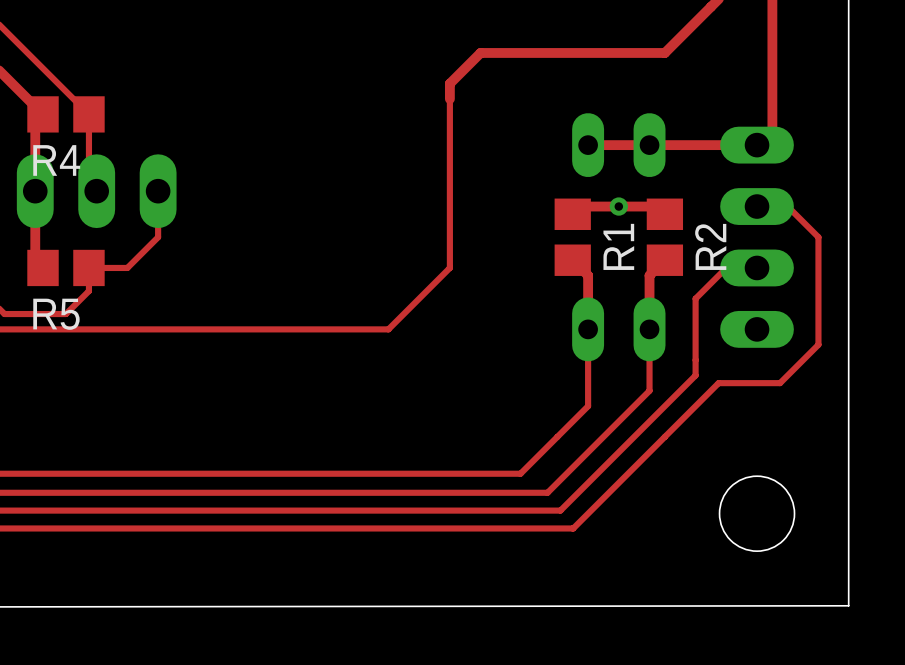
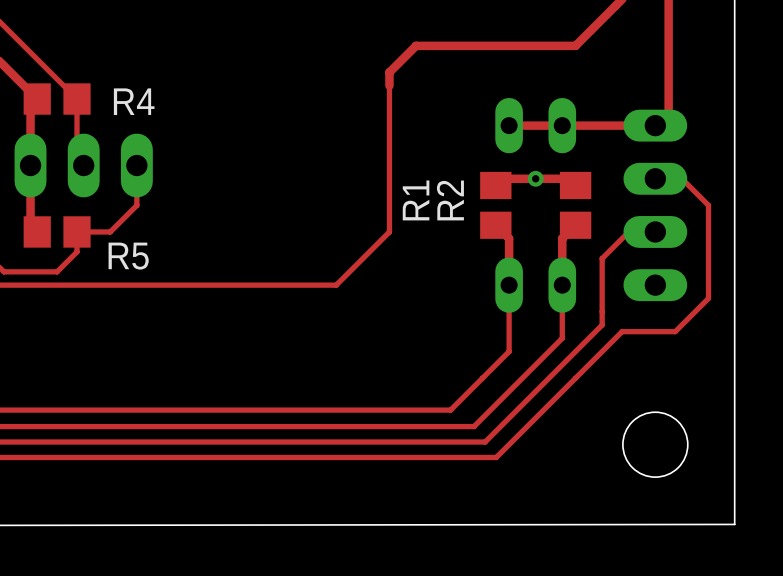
R4 name position: R4 (56, 160) -> R4 (134, 101)
R1 name position: R1 (618, 246) -> R1 (416, 200)
R2 name position: R2 (710, 246) -> R2 (450, 200)
R5 name position: R5 (56, 314) -> R5 (128, 256)

